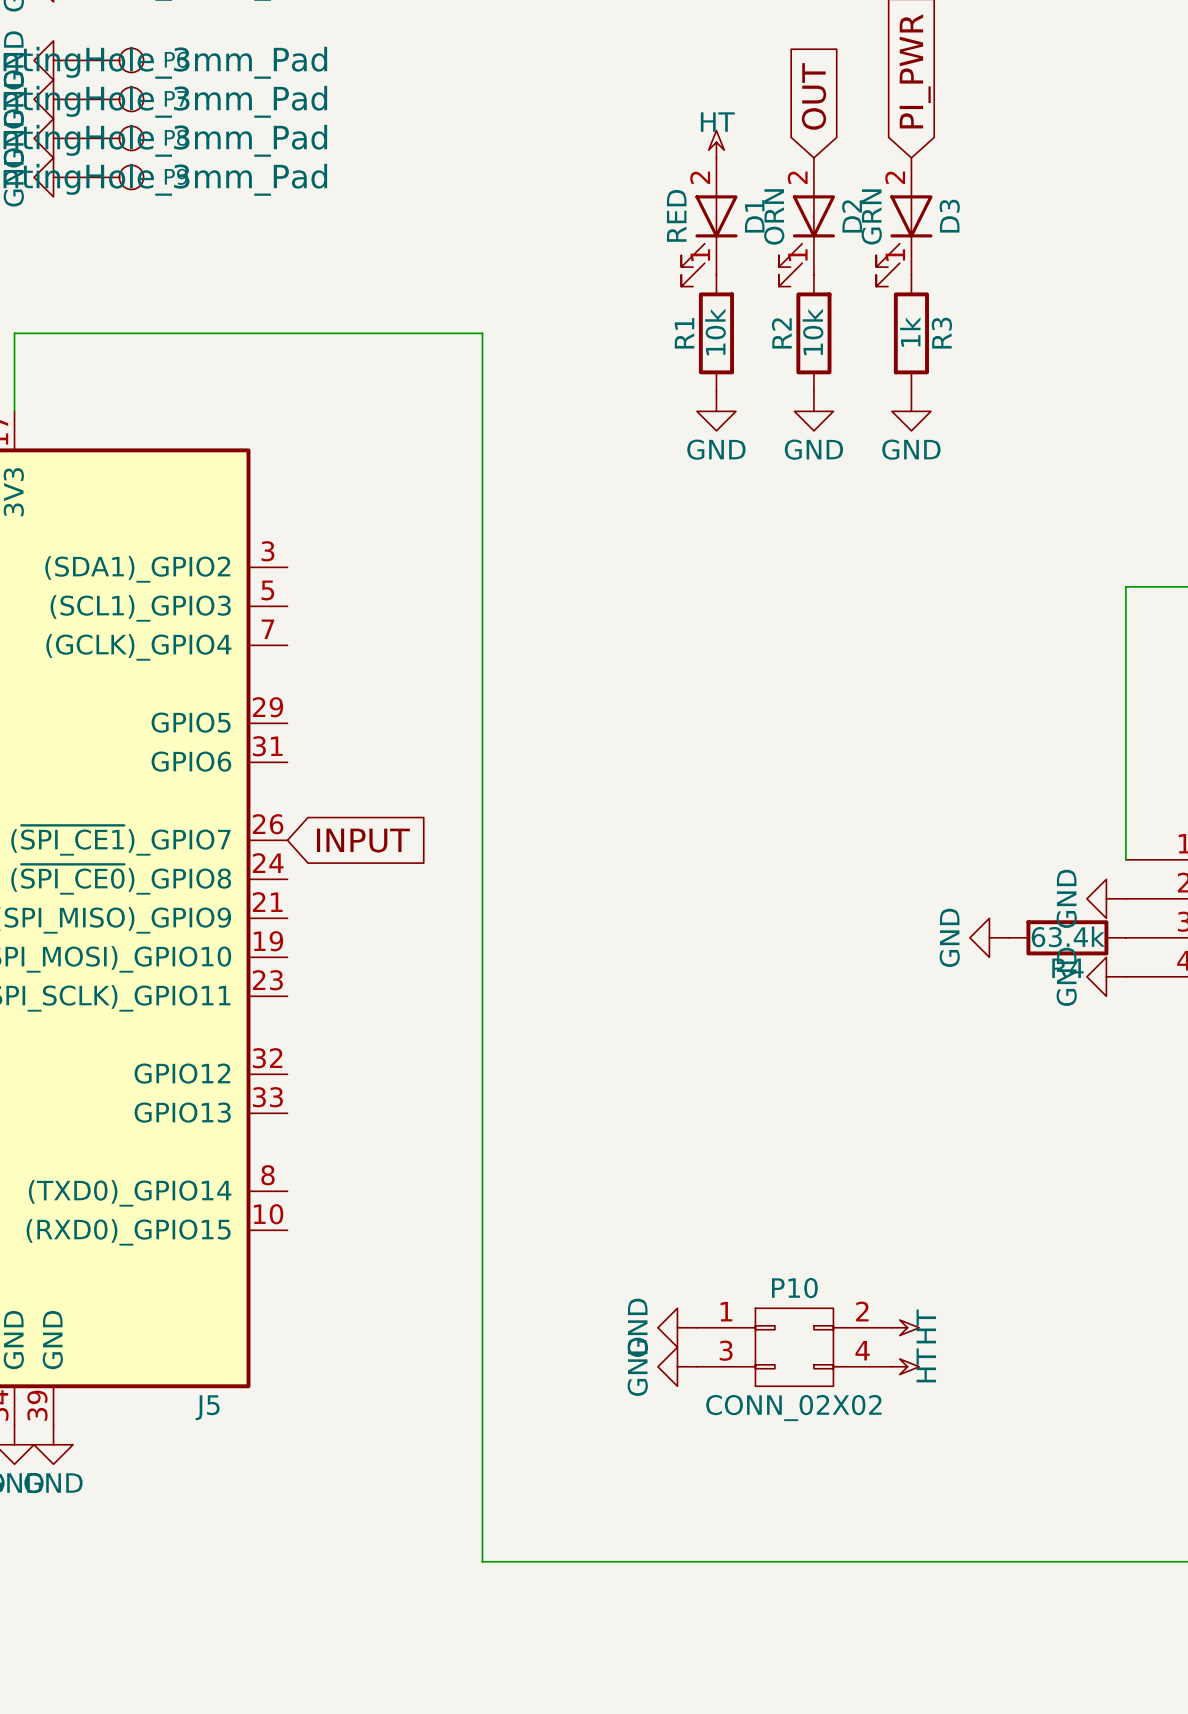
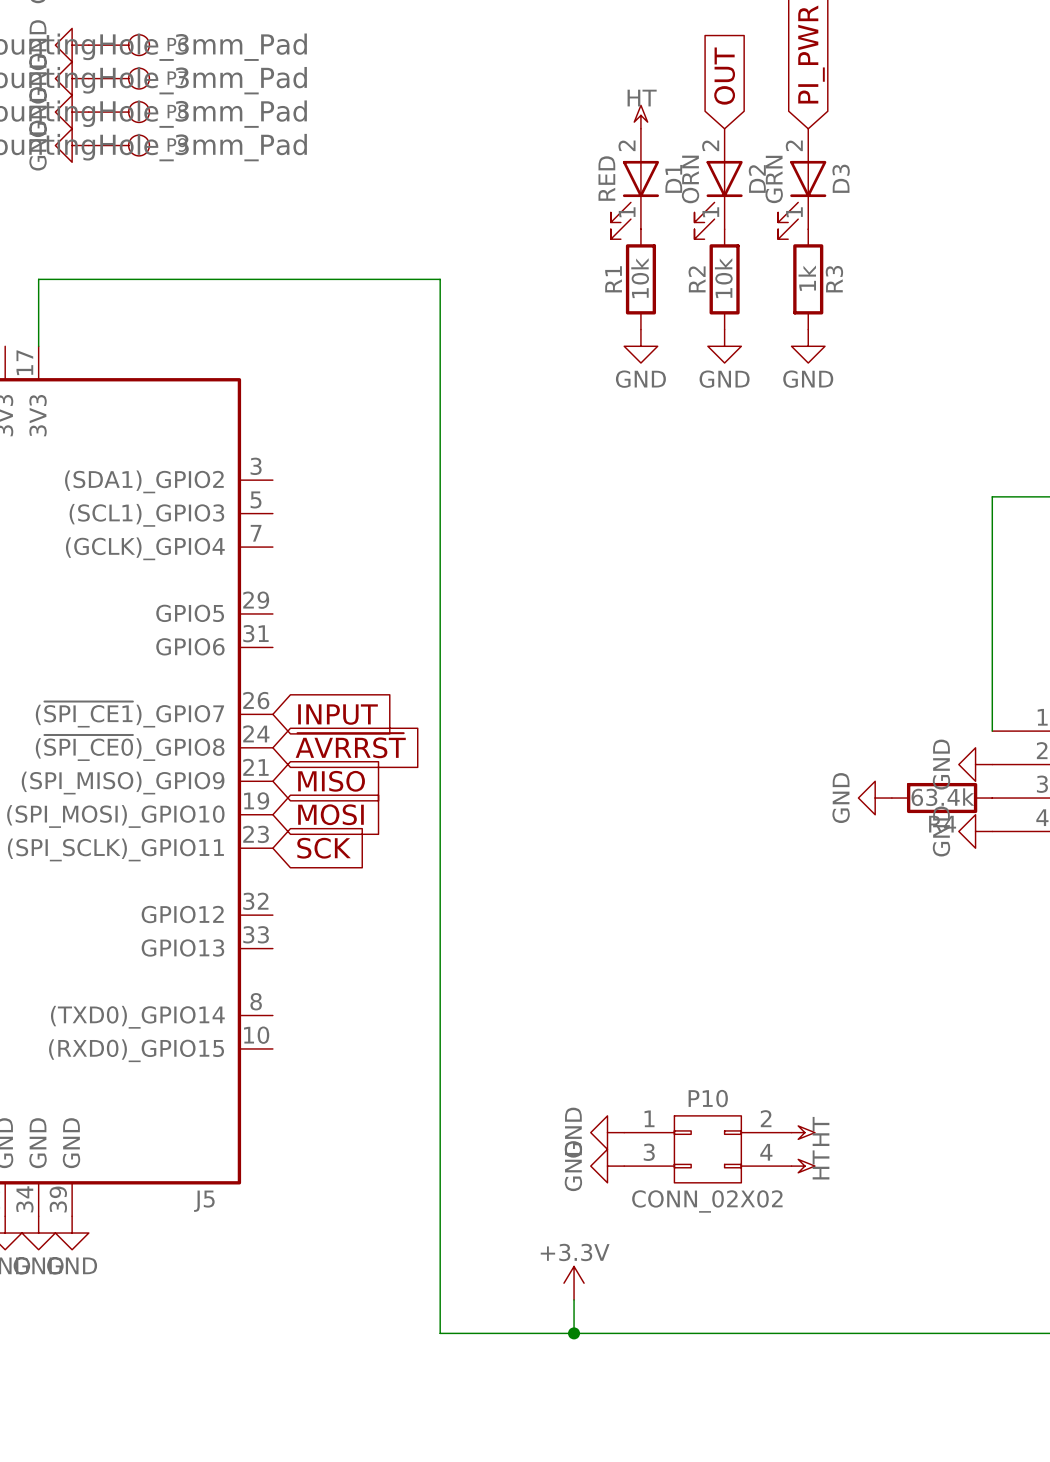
global label: none -> ~{AVRRST} (350, 745)
global label: none -> MISO (331, 781)
global label: none -> MOSI (330, 814)
global label: none -> SCK (324, 848)
power symbol: none -> +3.3V (574, 1283)
wire: none -> (574, 1299) (574, 1333)
junction: none -> (574, 1333)

